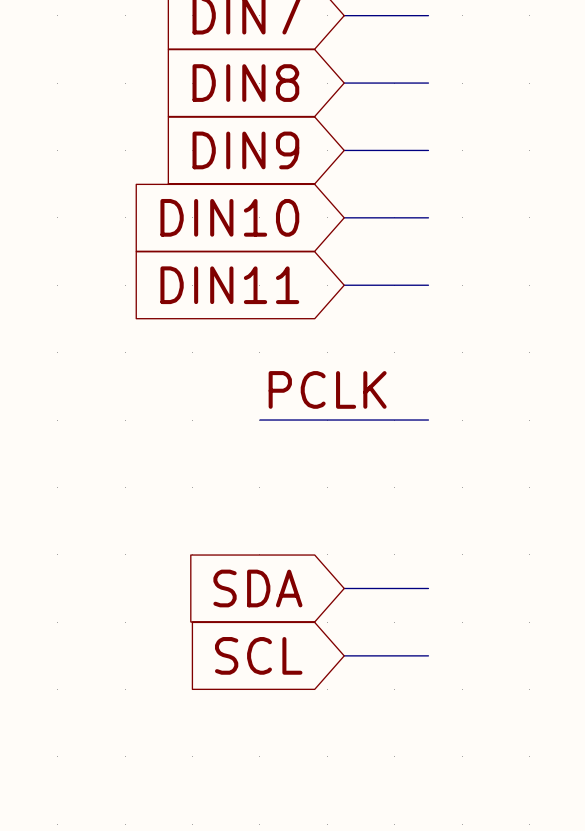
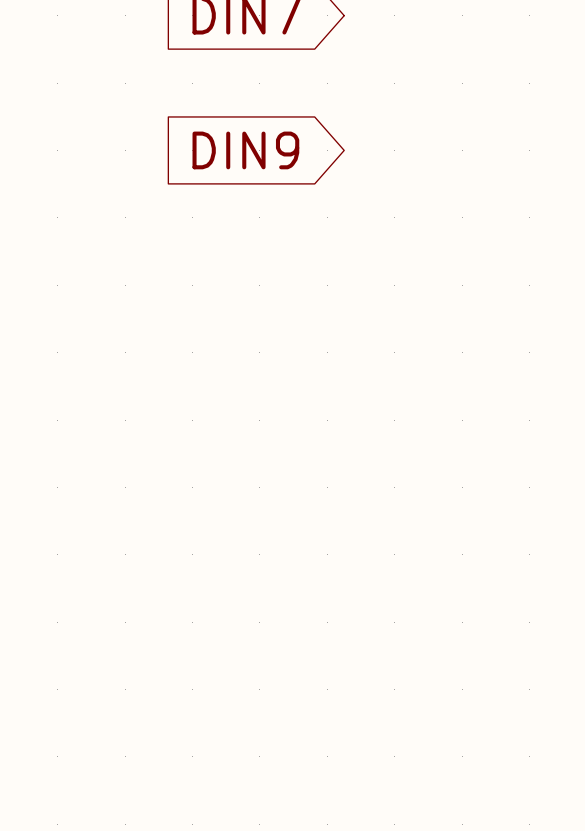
wire: (344, 15) (428, 15) -> none
global label: DIN8 (245, 83) -> none
wire: (344, 83) (428, 83) -> none
wire: (344, 150) (428, 150) -> none
global label: DIN10 (229, 217) -> none
wire: (344, 217) (428, 217) -> none
global label: DIN11 (229, 285) -> none
wire: (344, 285) (428, 285) -> none
label: PCLK (327, 389) -> none
wire: (259, 420) (428, 420) -> none
global label: SDA (257, 588) -> none
wire: (344, 588) (428, 588) -> none
global label: SCL (258, 655) -> none
wire: (344, 655) (428, 655) -> none

